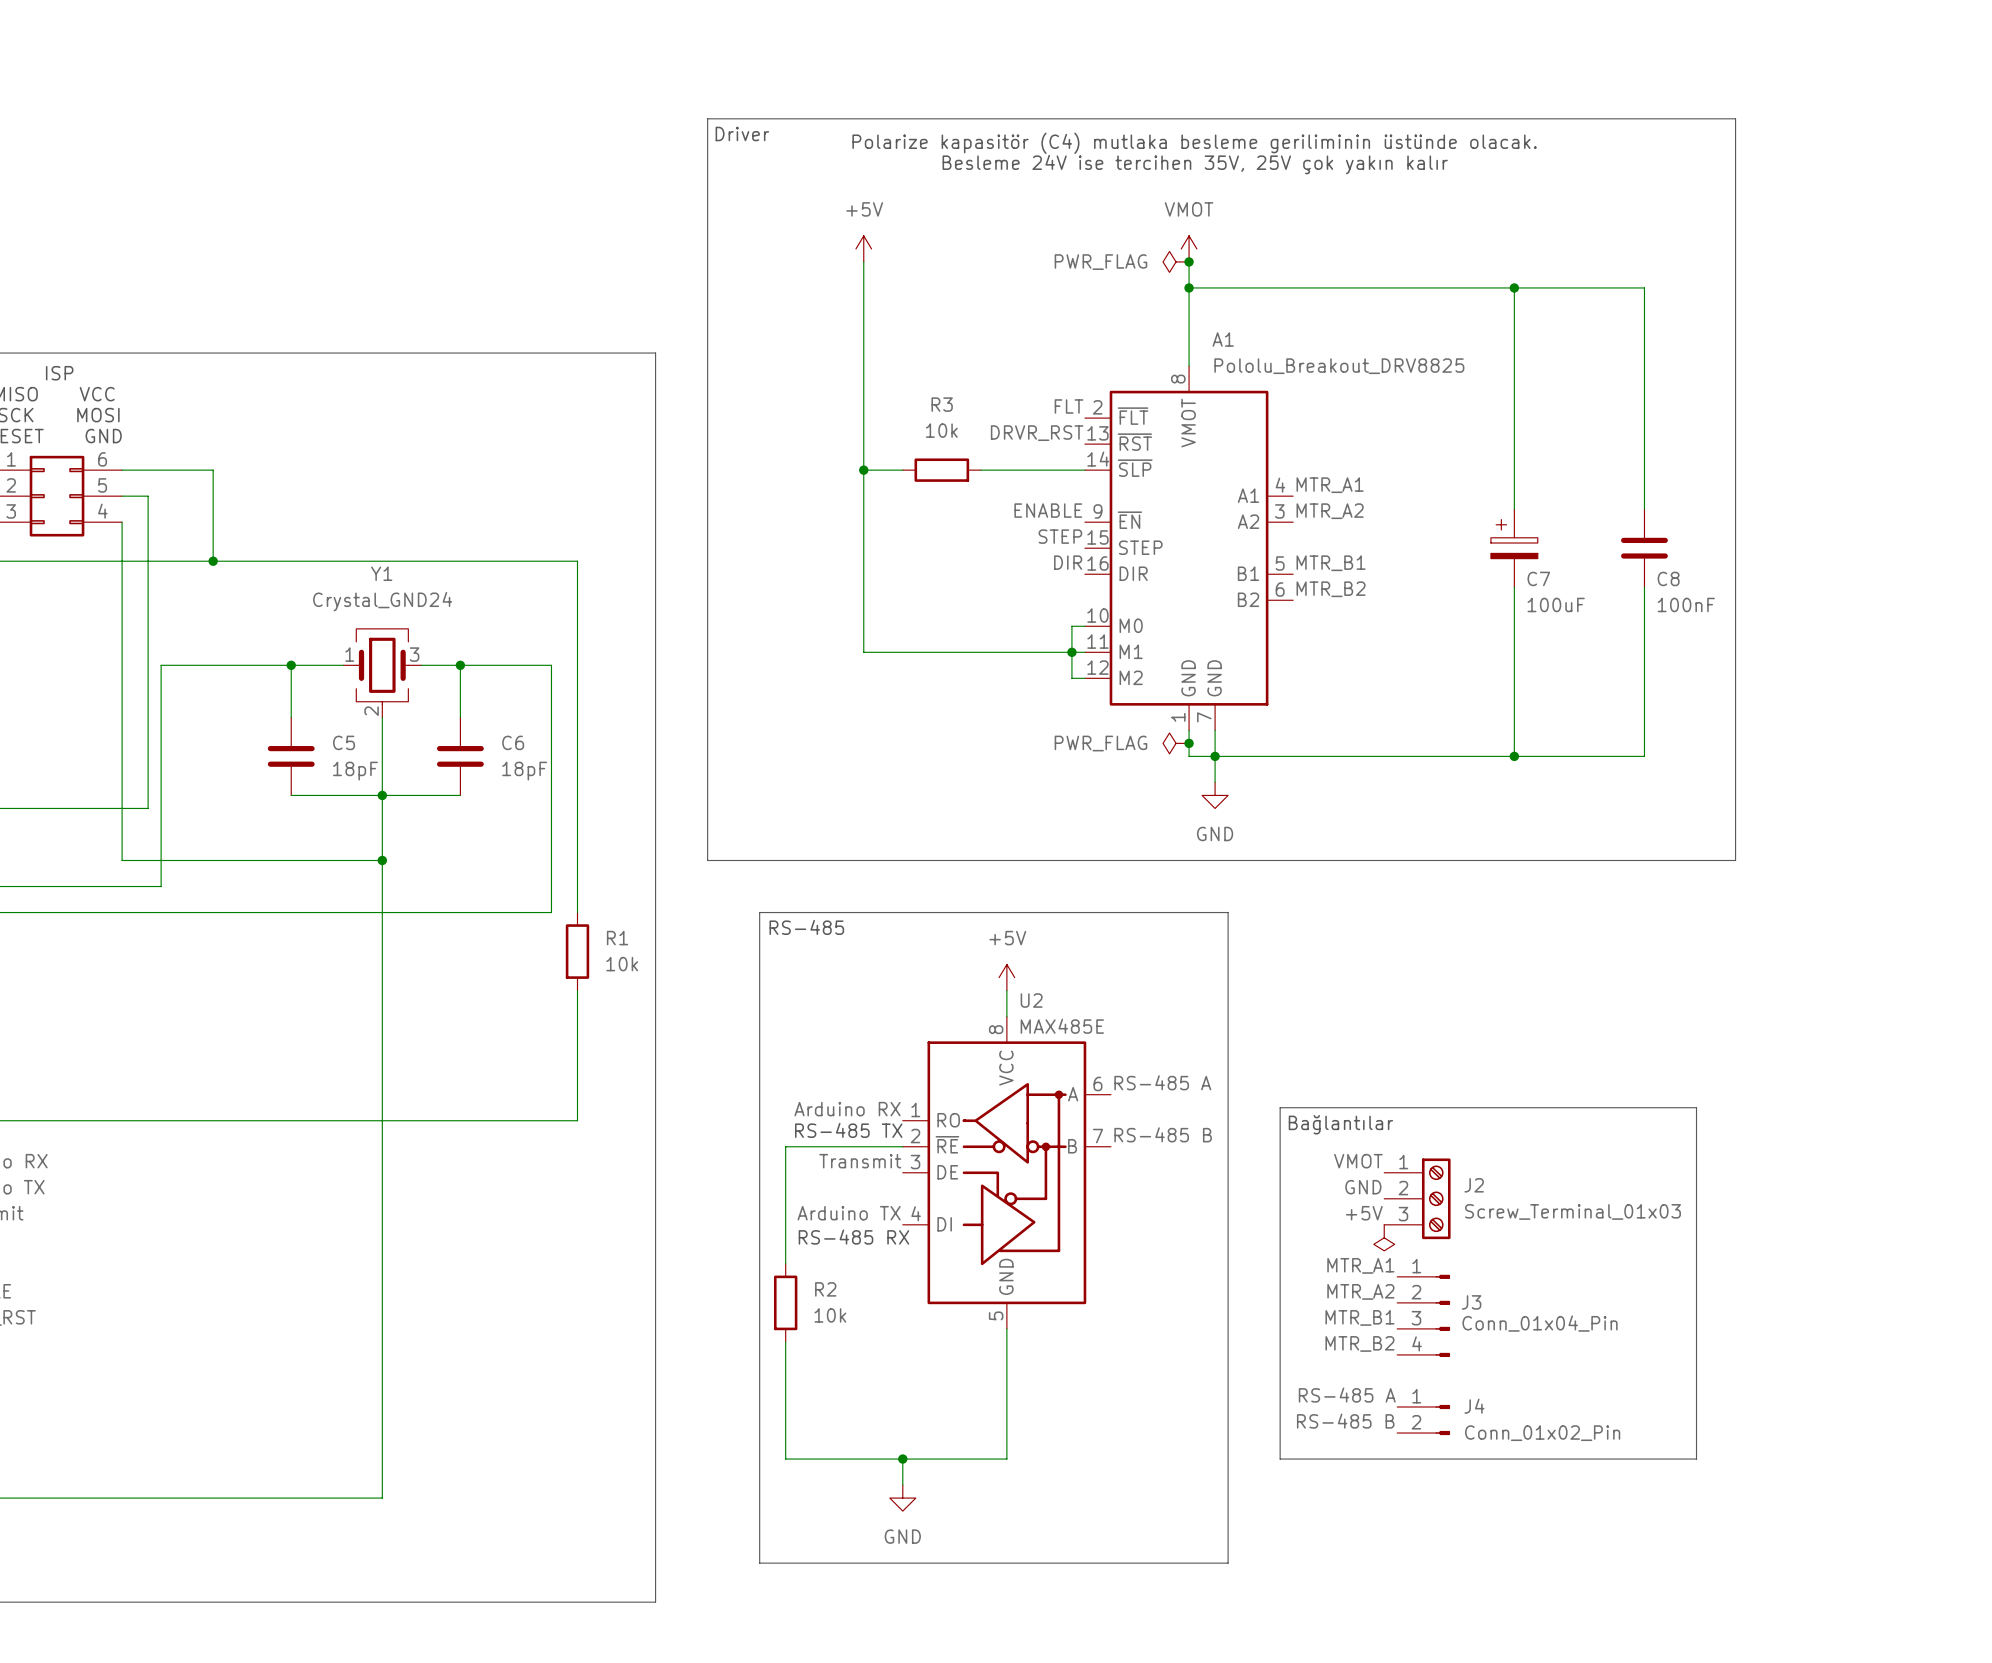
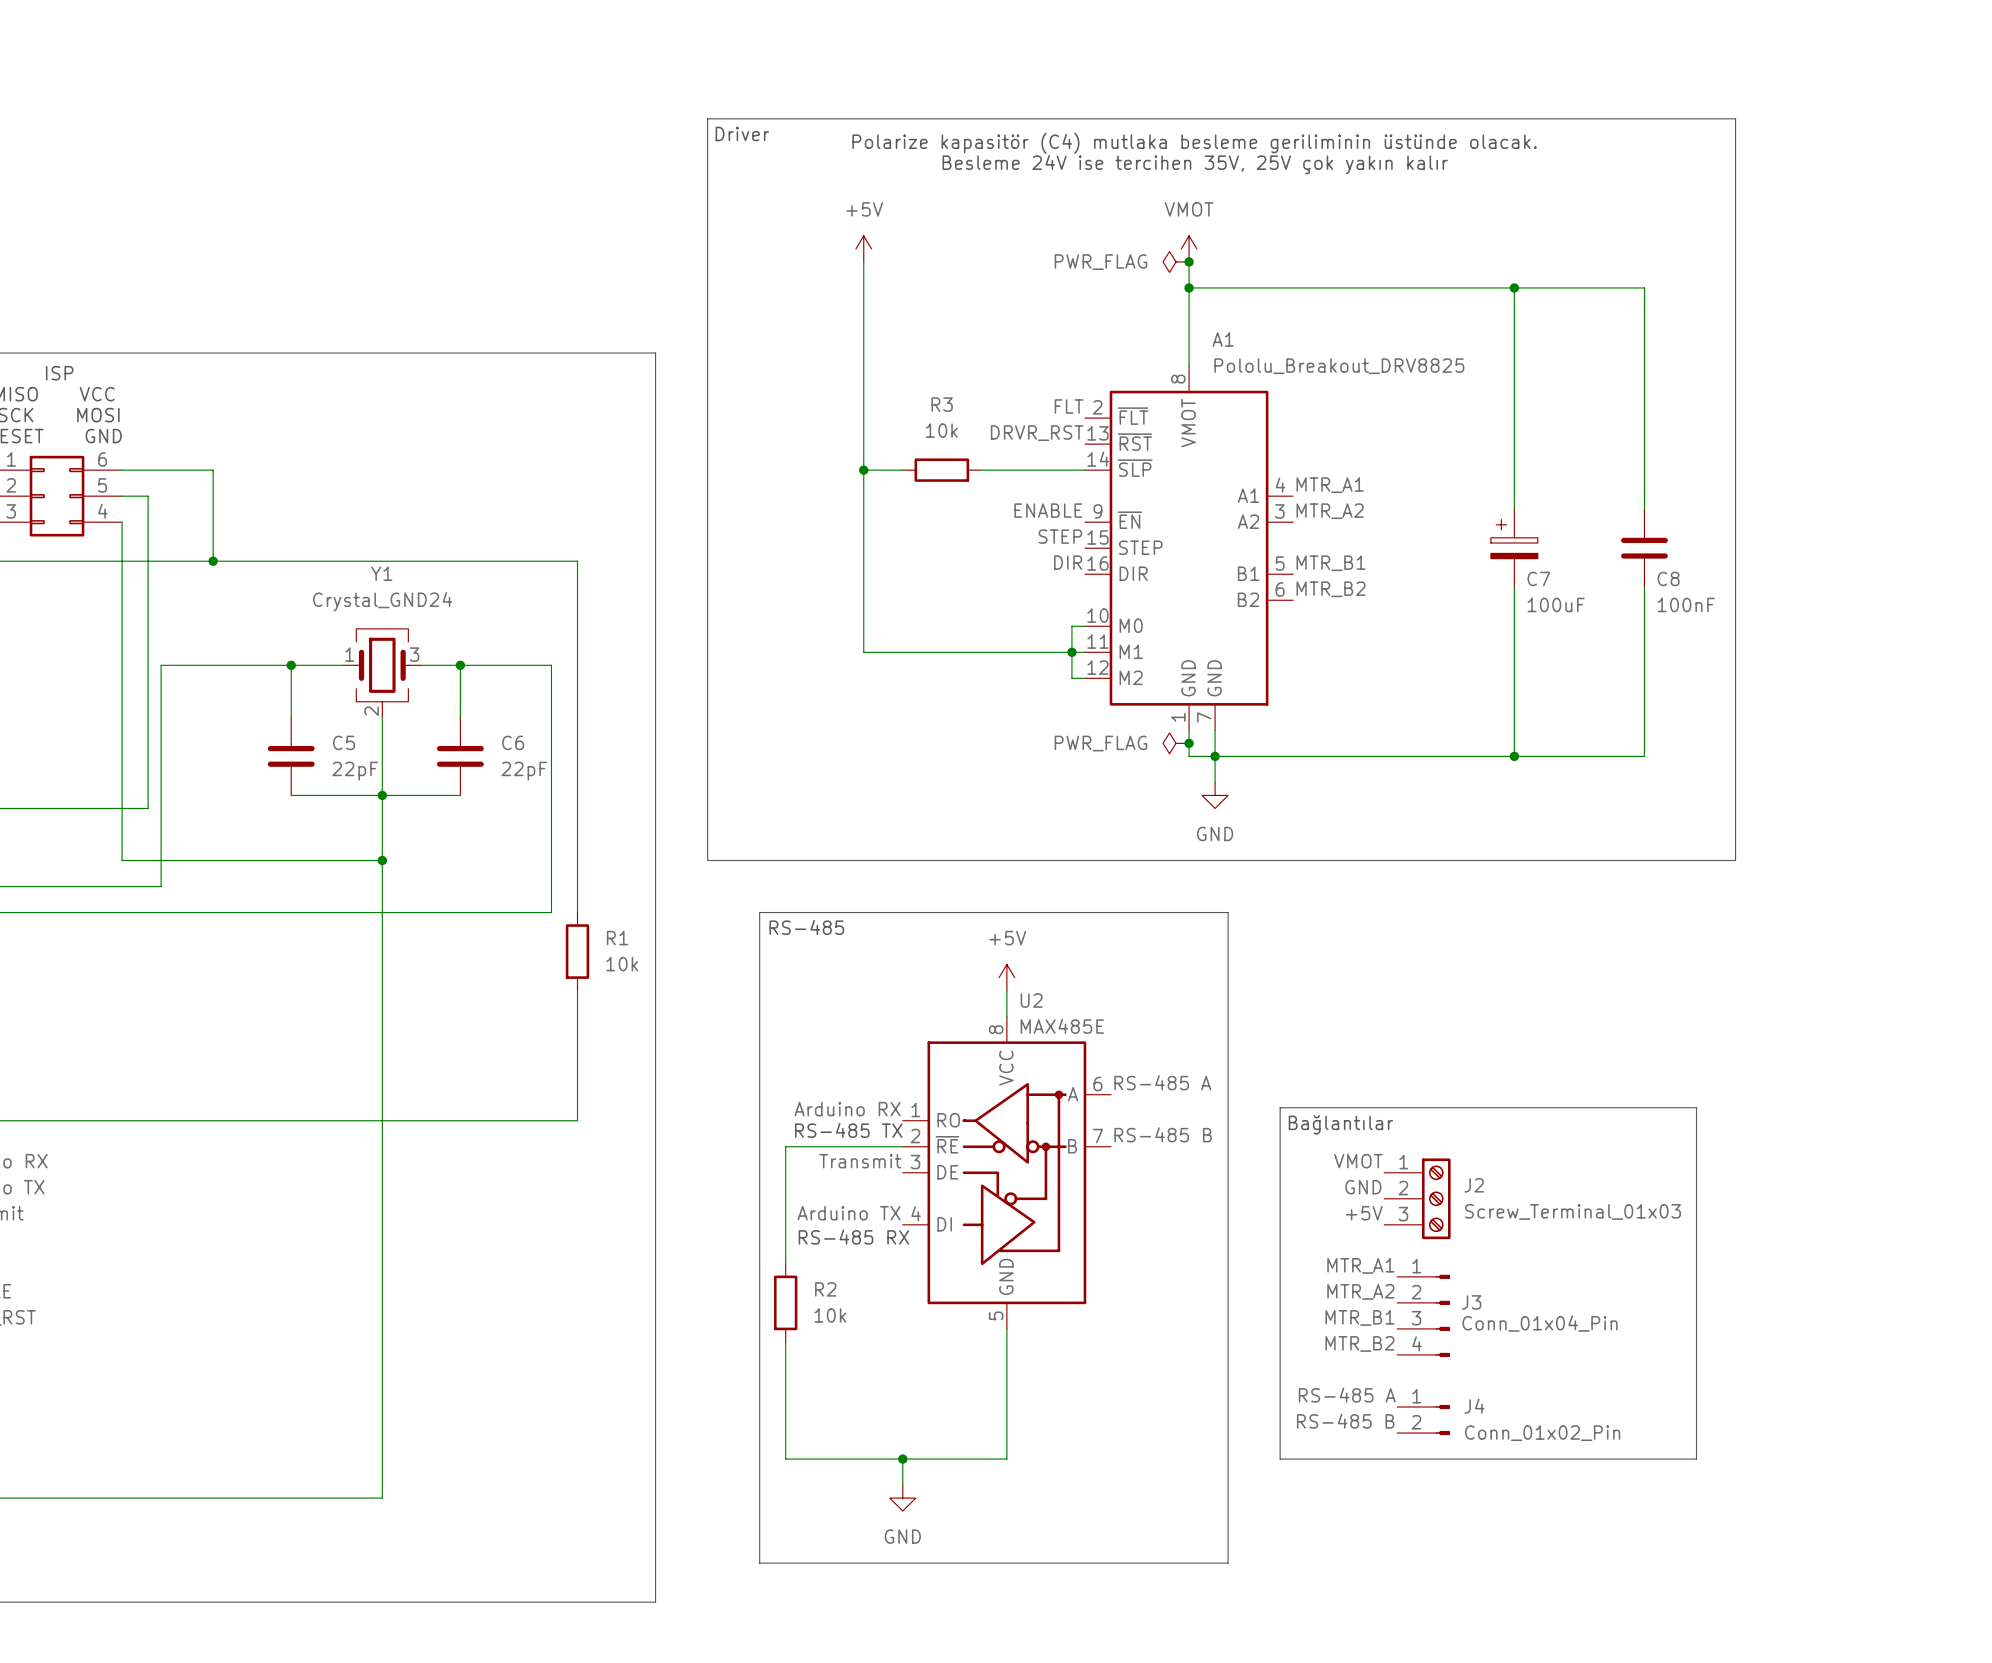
C5 value: 18pF (355, 771) -> 22pF (355, 771)
C6 value: 18pF (524, 771) -> 22pF (524, 771)
power symbol: (1384, 1237) -> none

